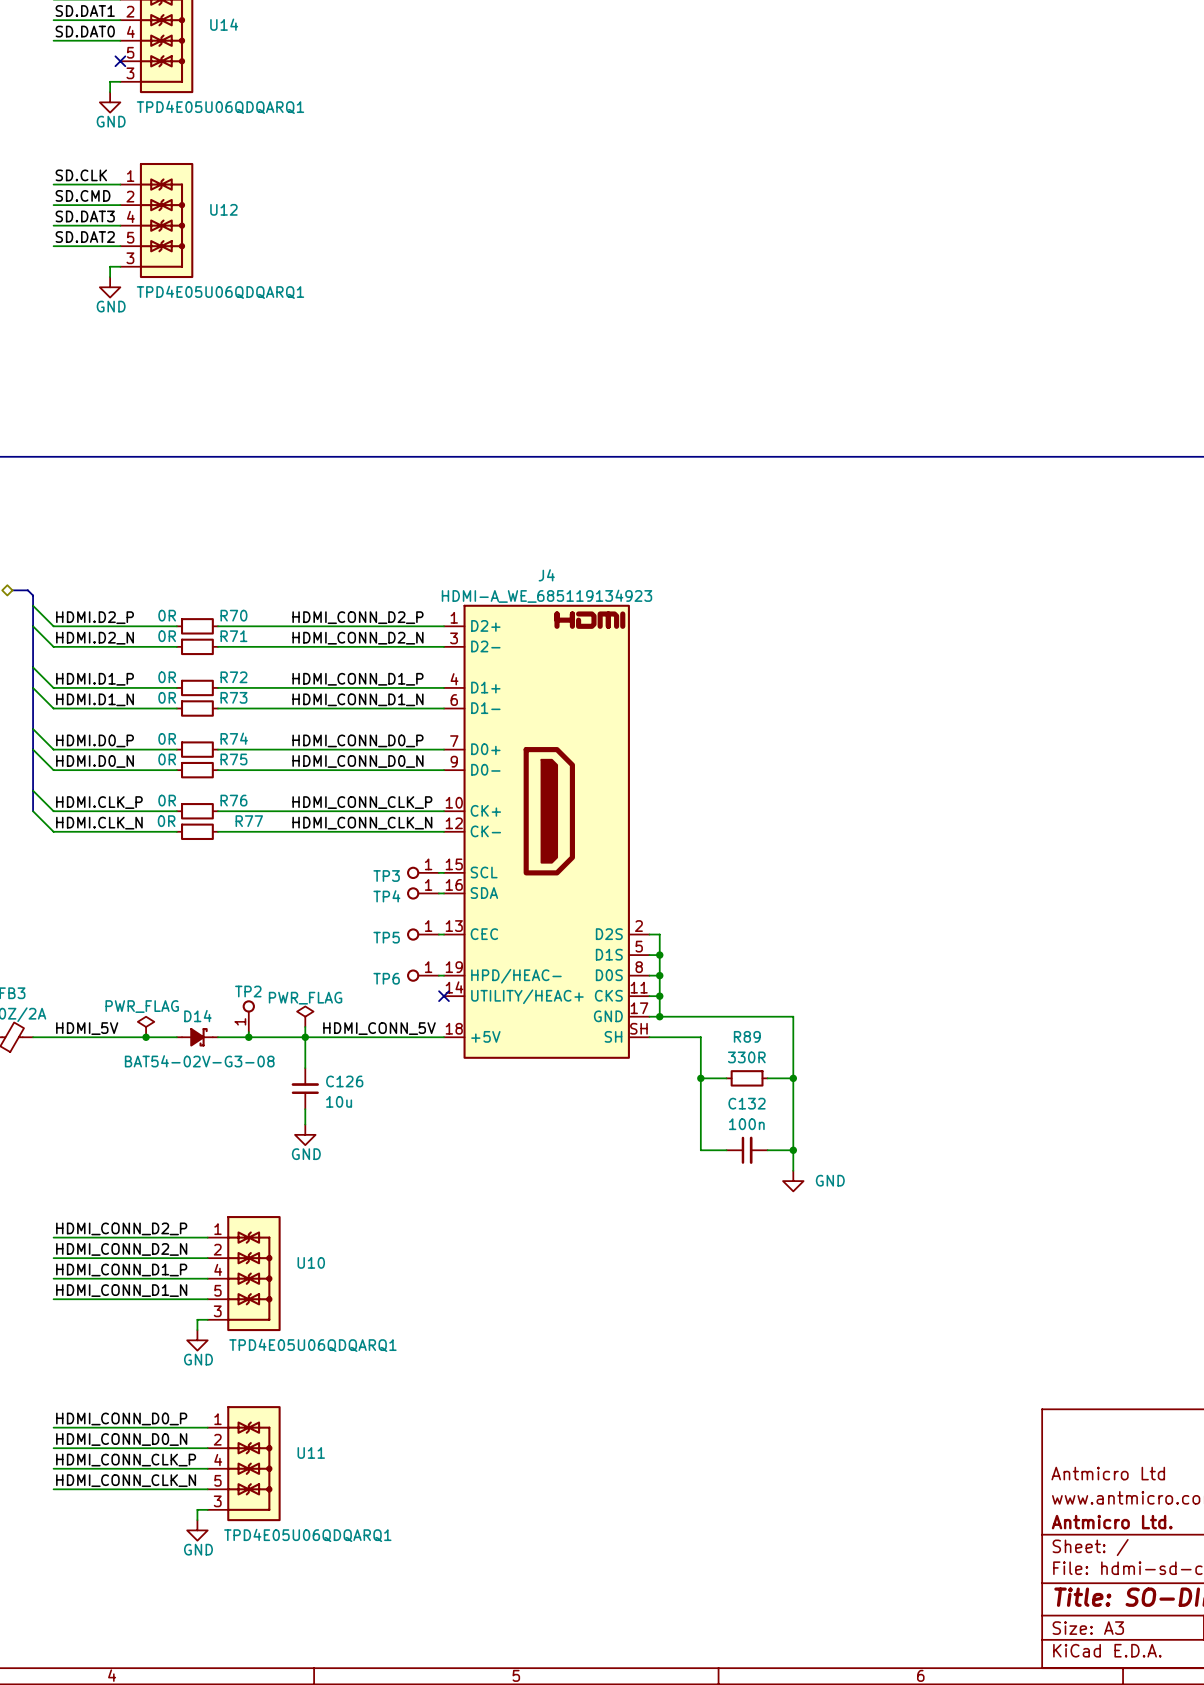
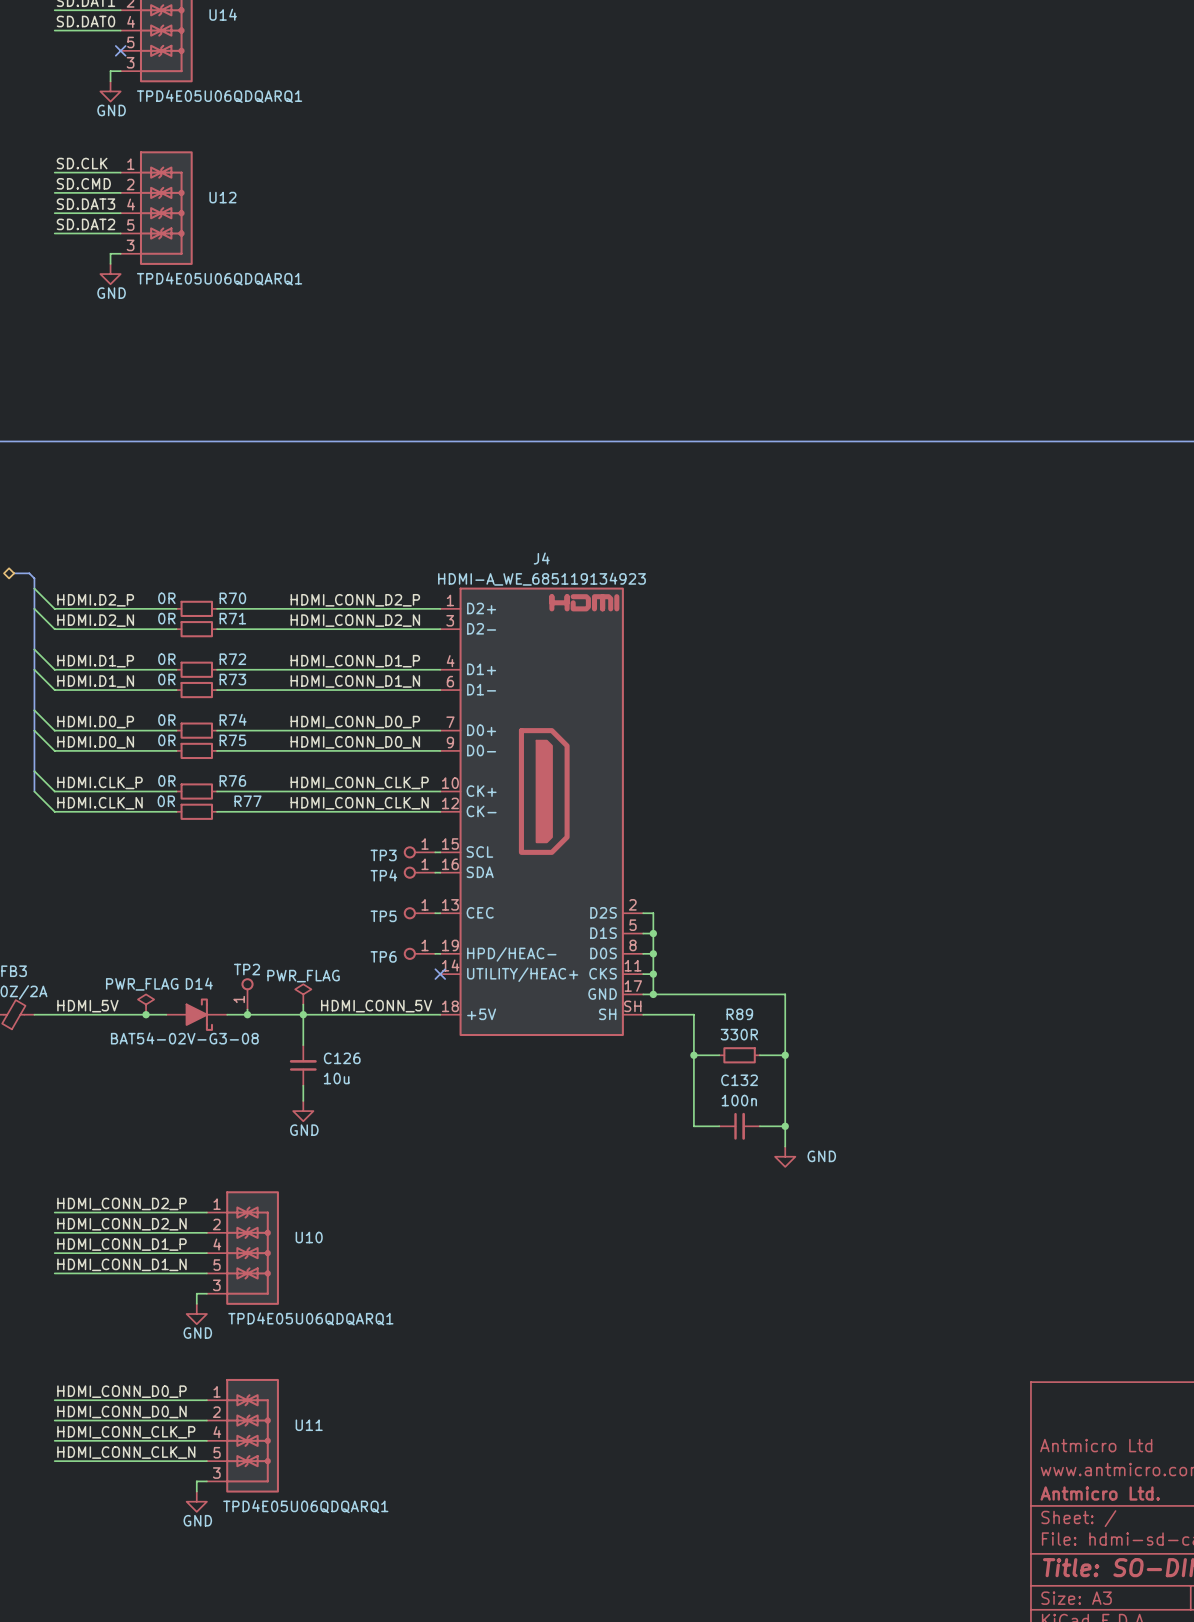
D14 symbol: [176, 1028, 218, 1047] -> [166, 998, 228, 1031]

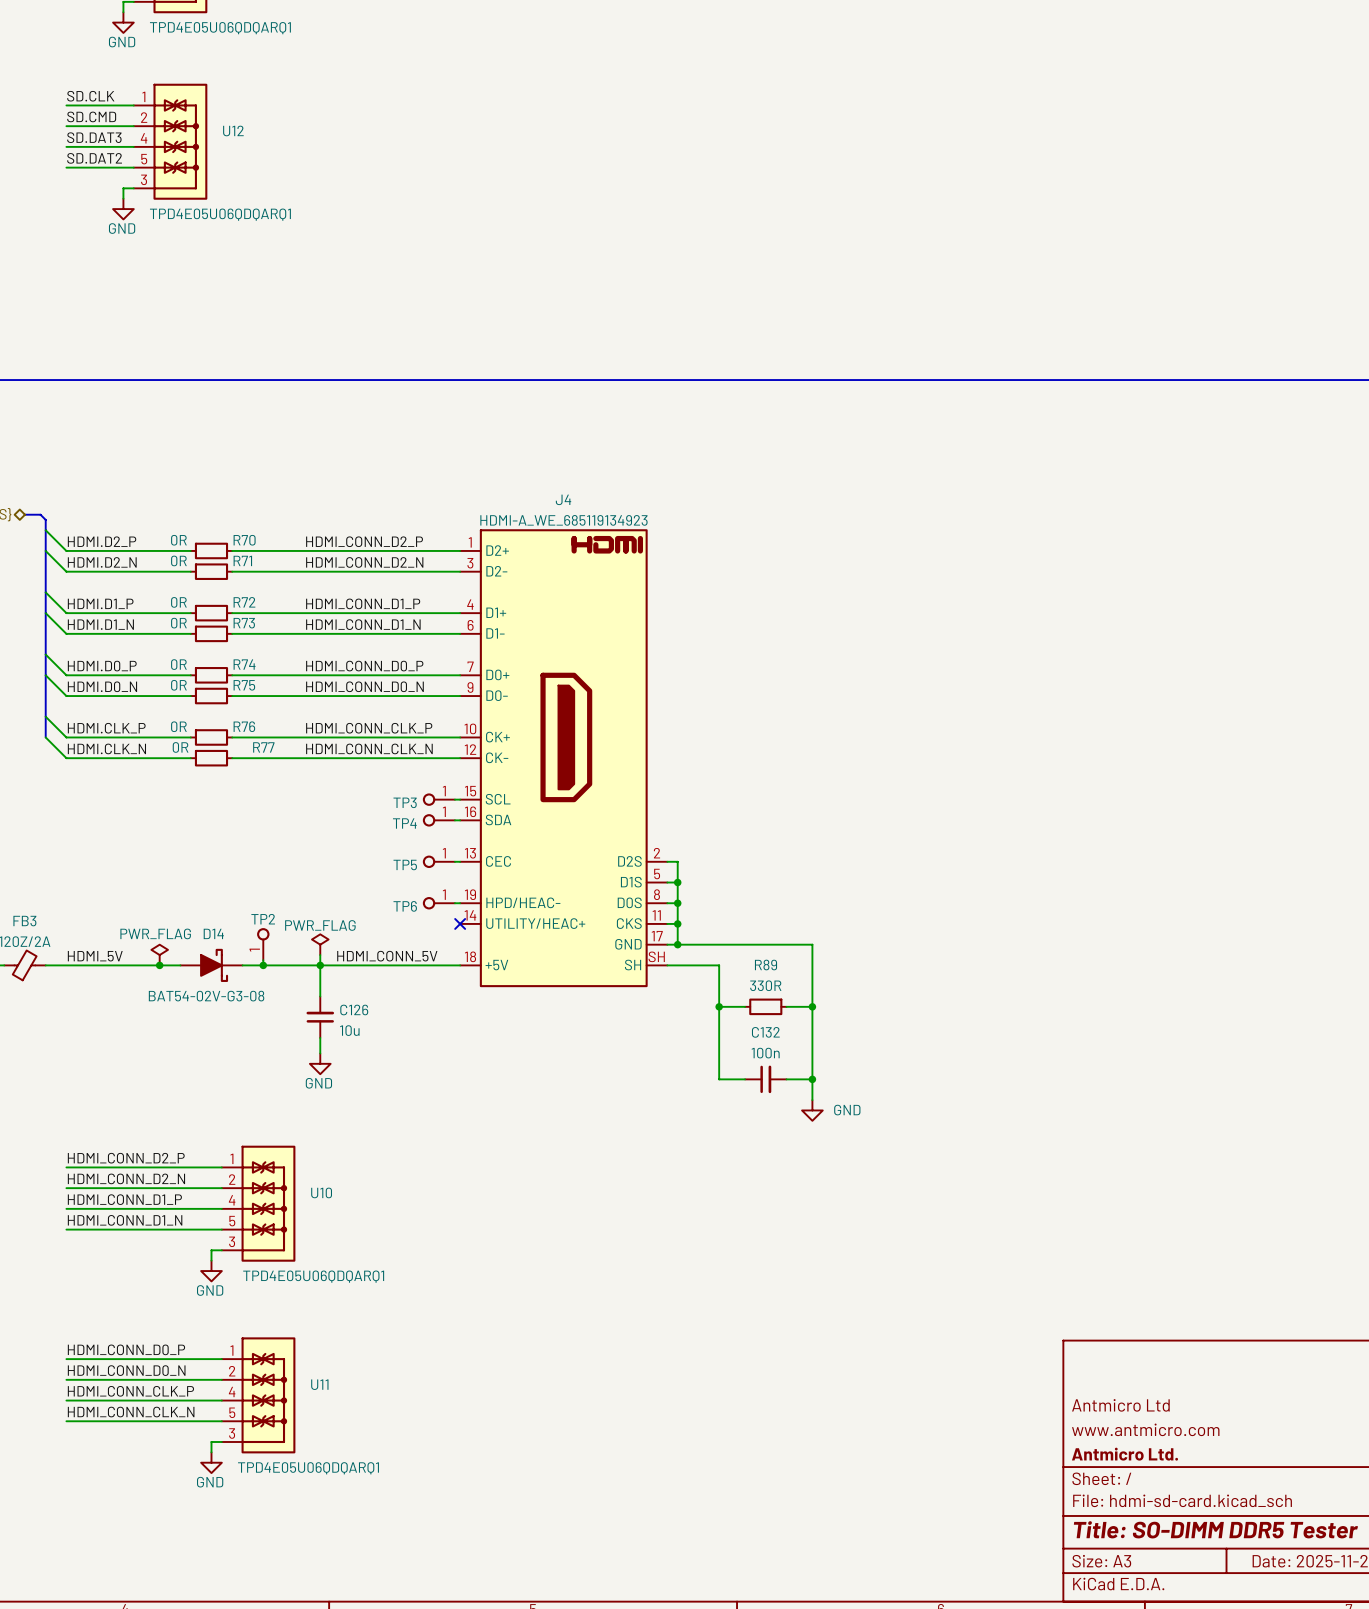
D14 text: BAT54-02V-G3-08 (184, 1038) -> none
D14 value: none -> BAT54-02V-G3-08 (206, 996)

